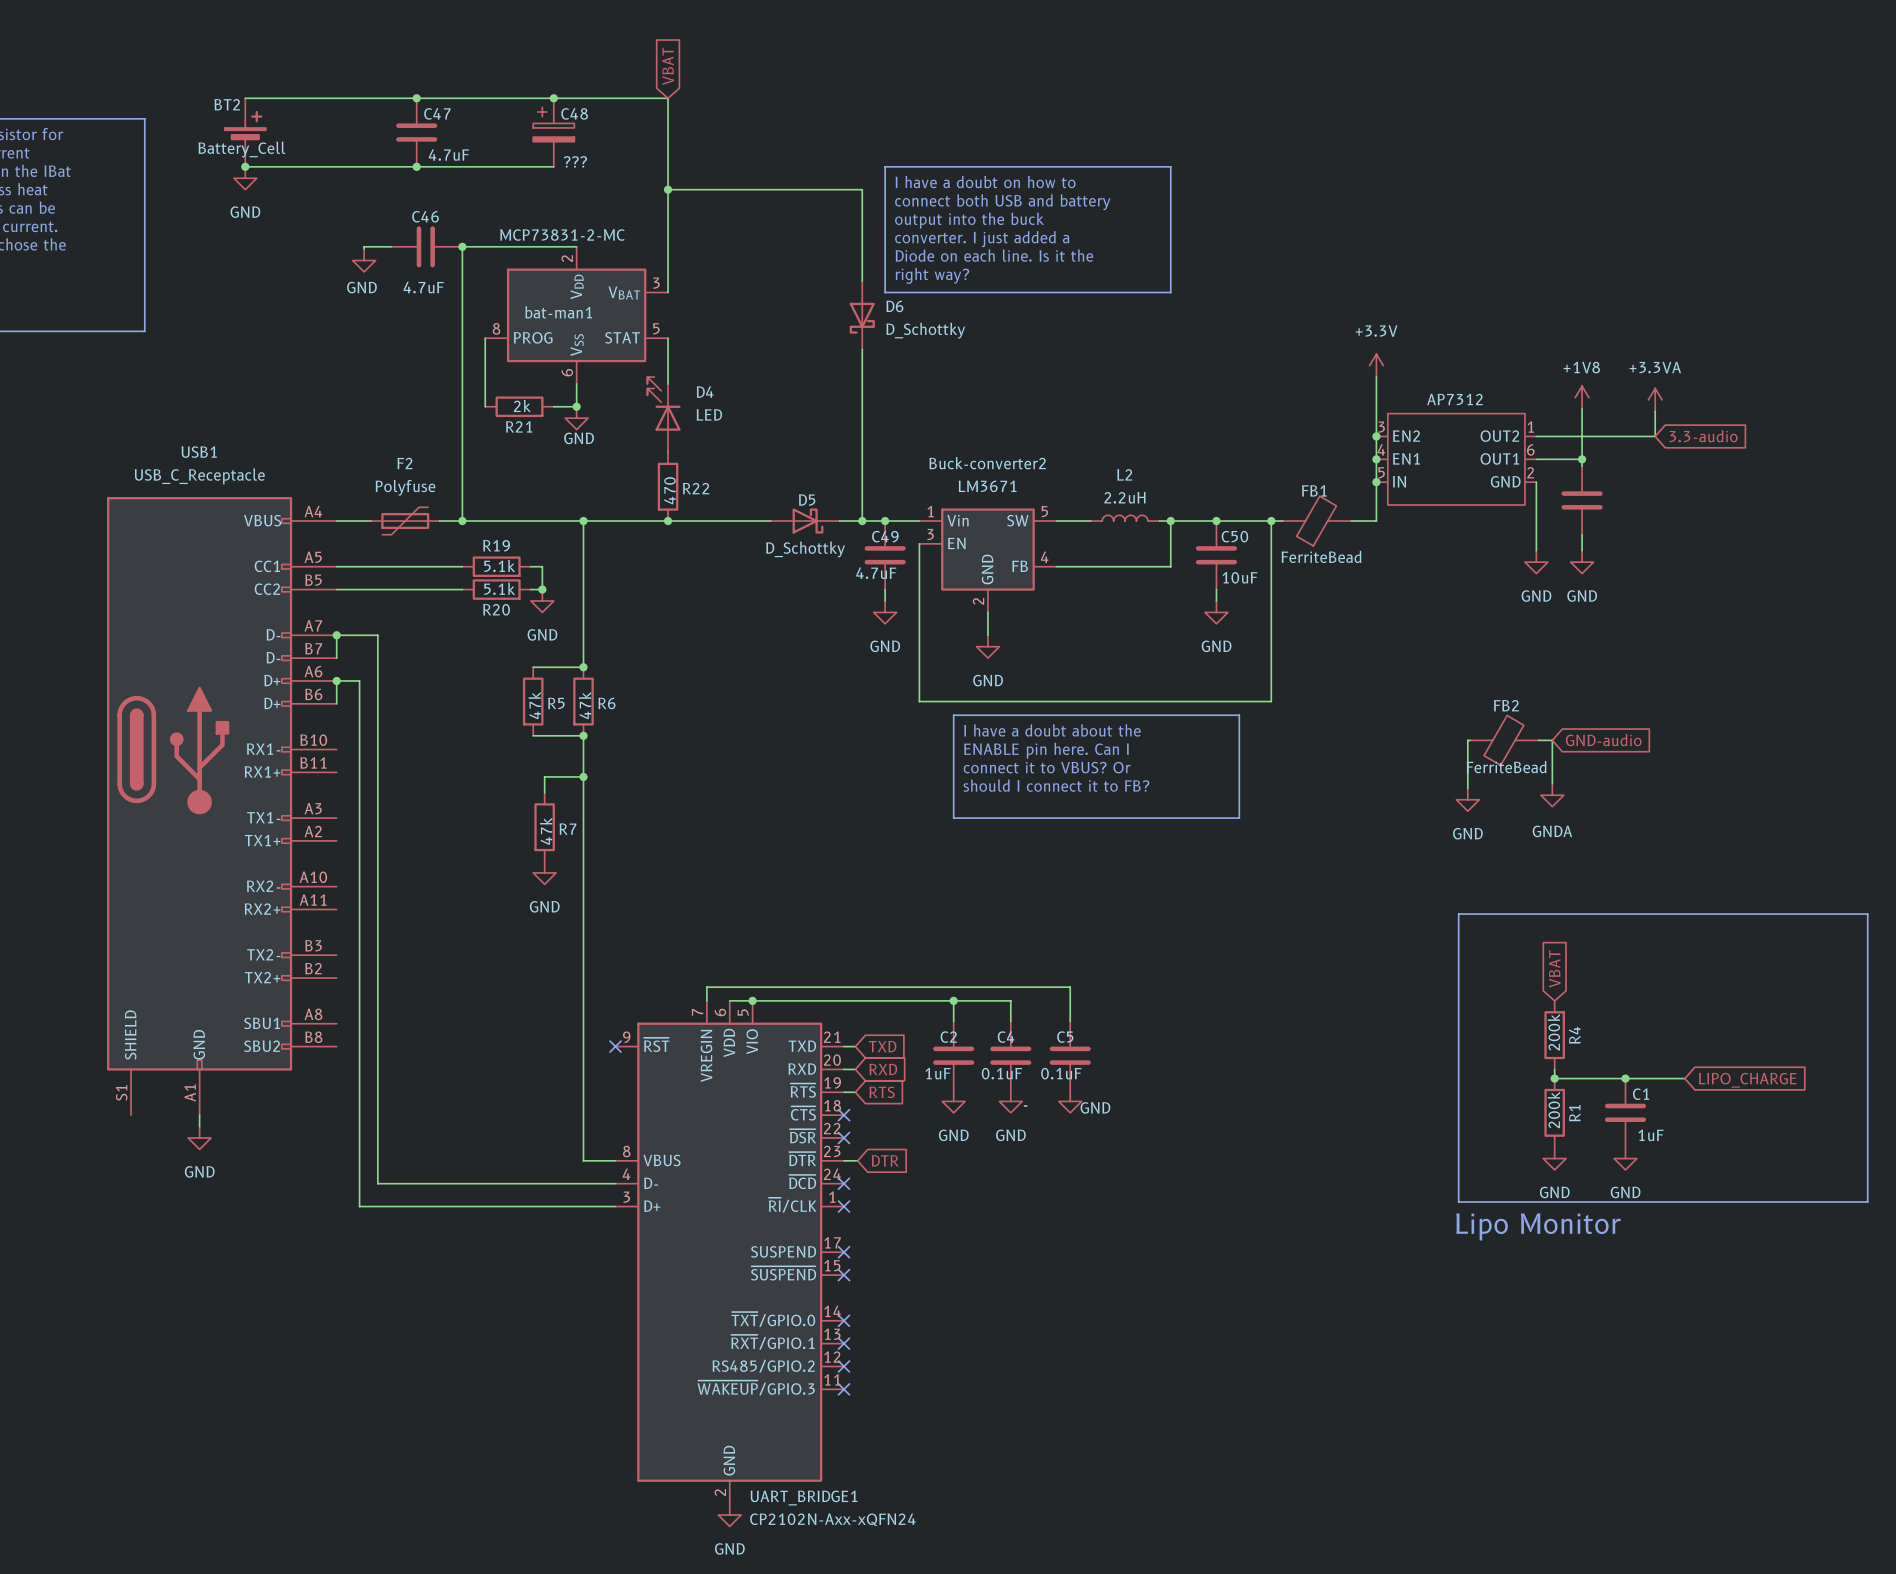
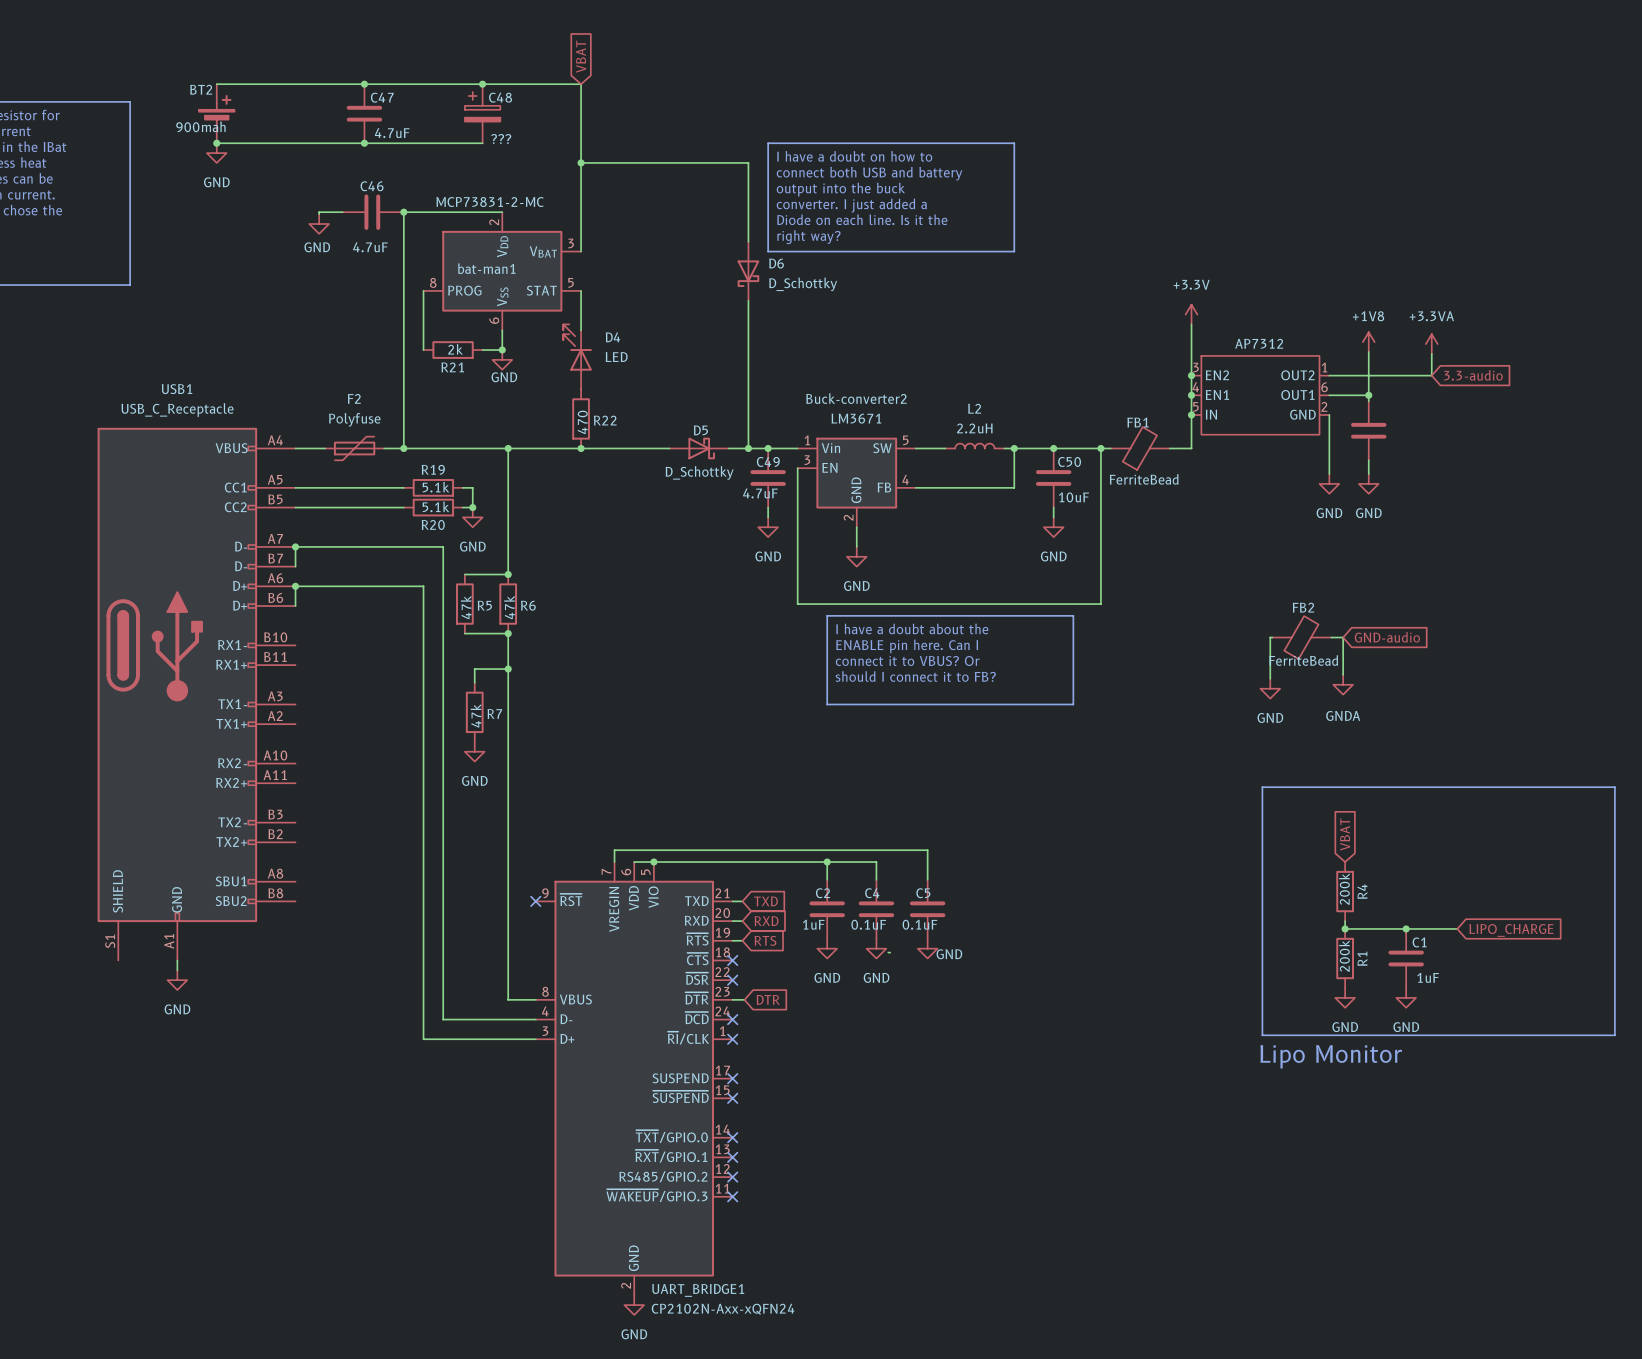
BT2 value: Battery_Cell (241, 149) -> 900mah (200, 126)
wire: (377, 635) (377, 1183) (508, 1183) -> (330, 546) (443, 546) (443, 1019)
wire: (359, 680) (359, 1206) (485, 1206) -> (315, 586) (423, 586) (423, 1039)

